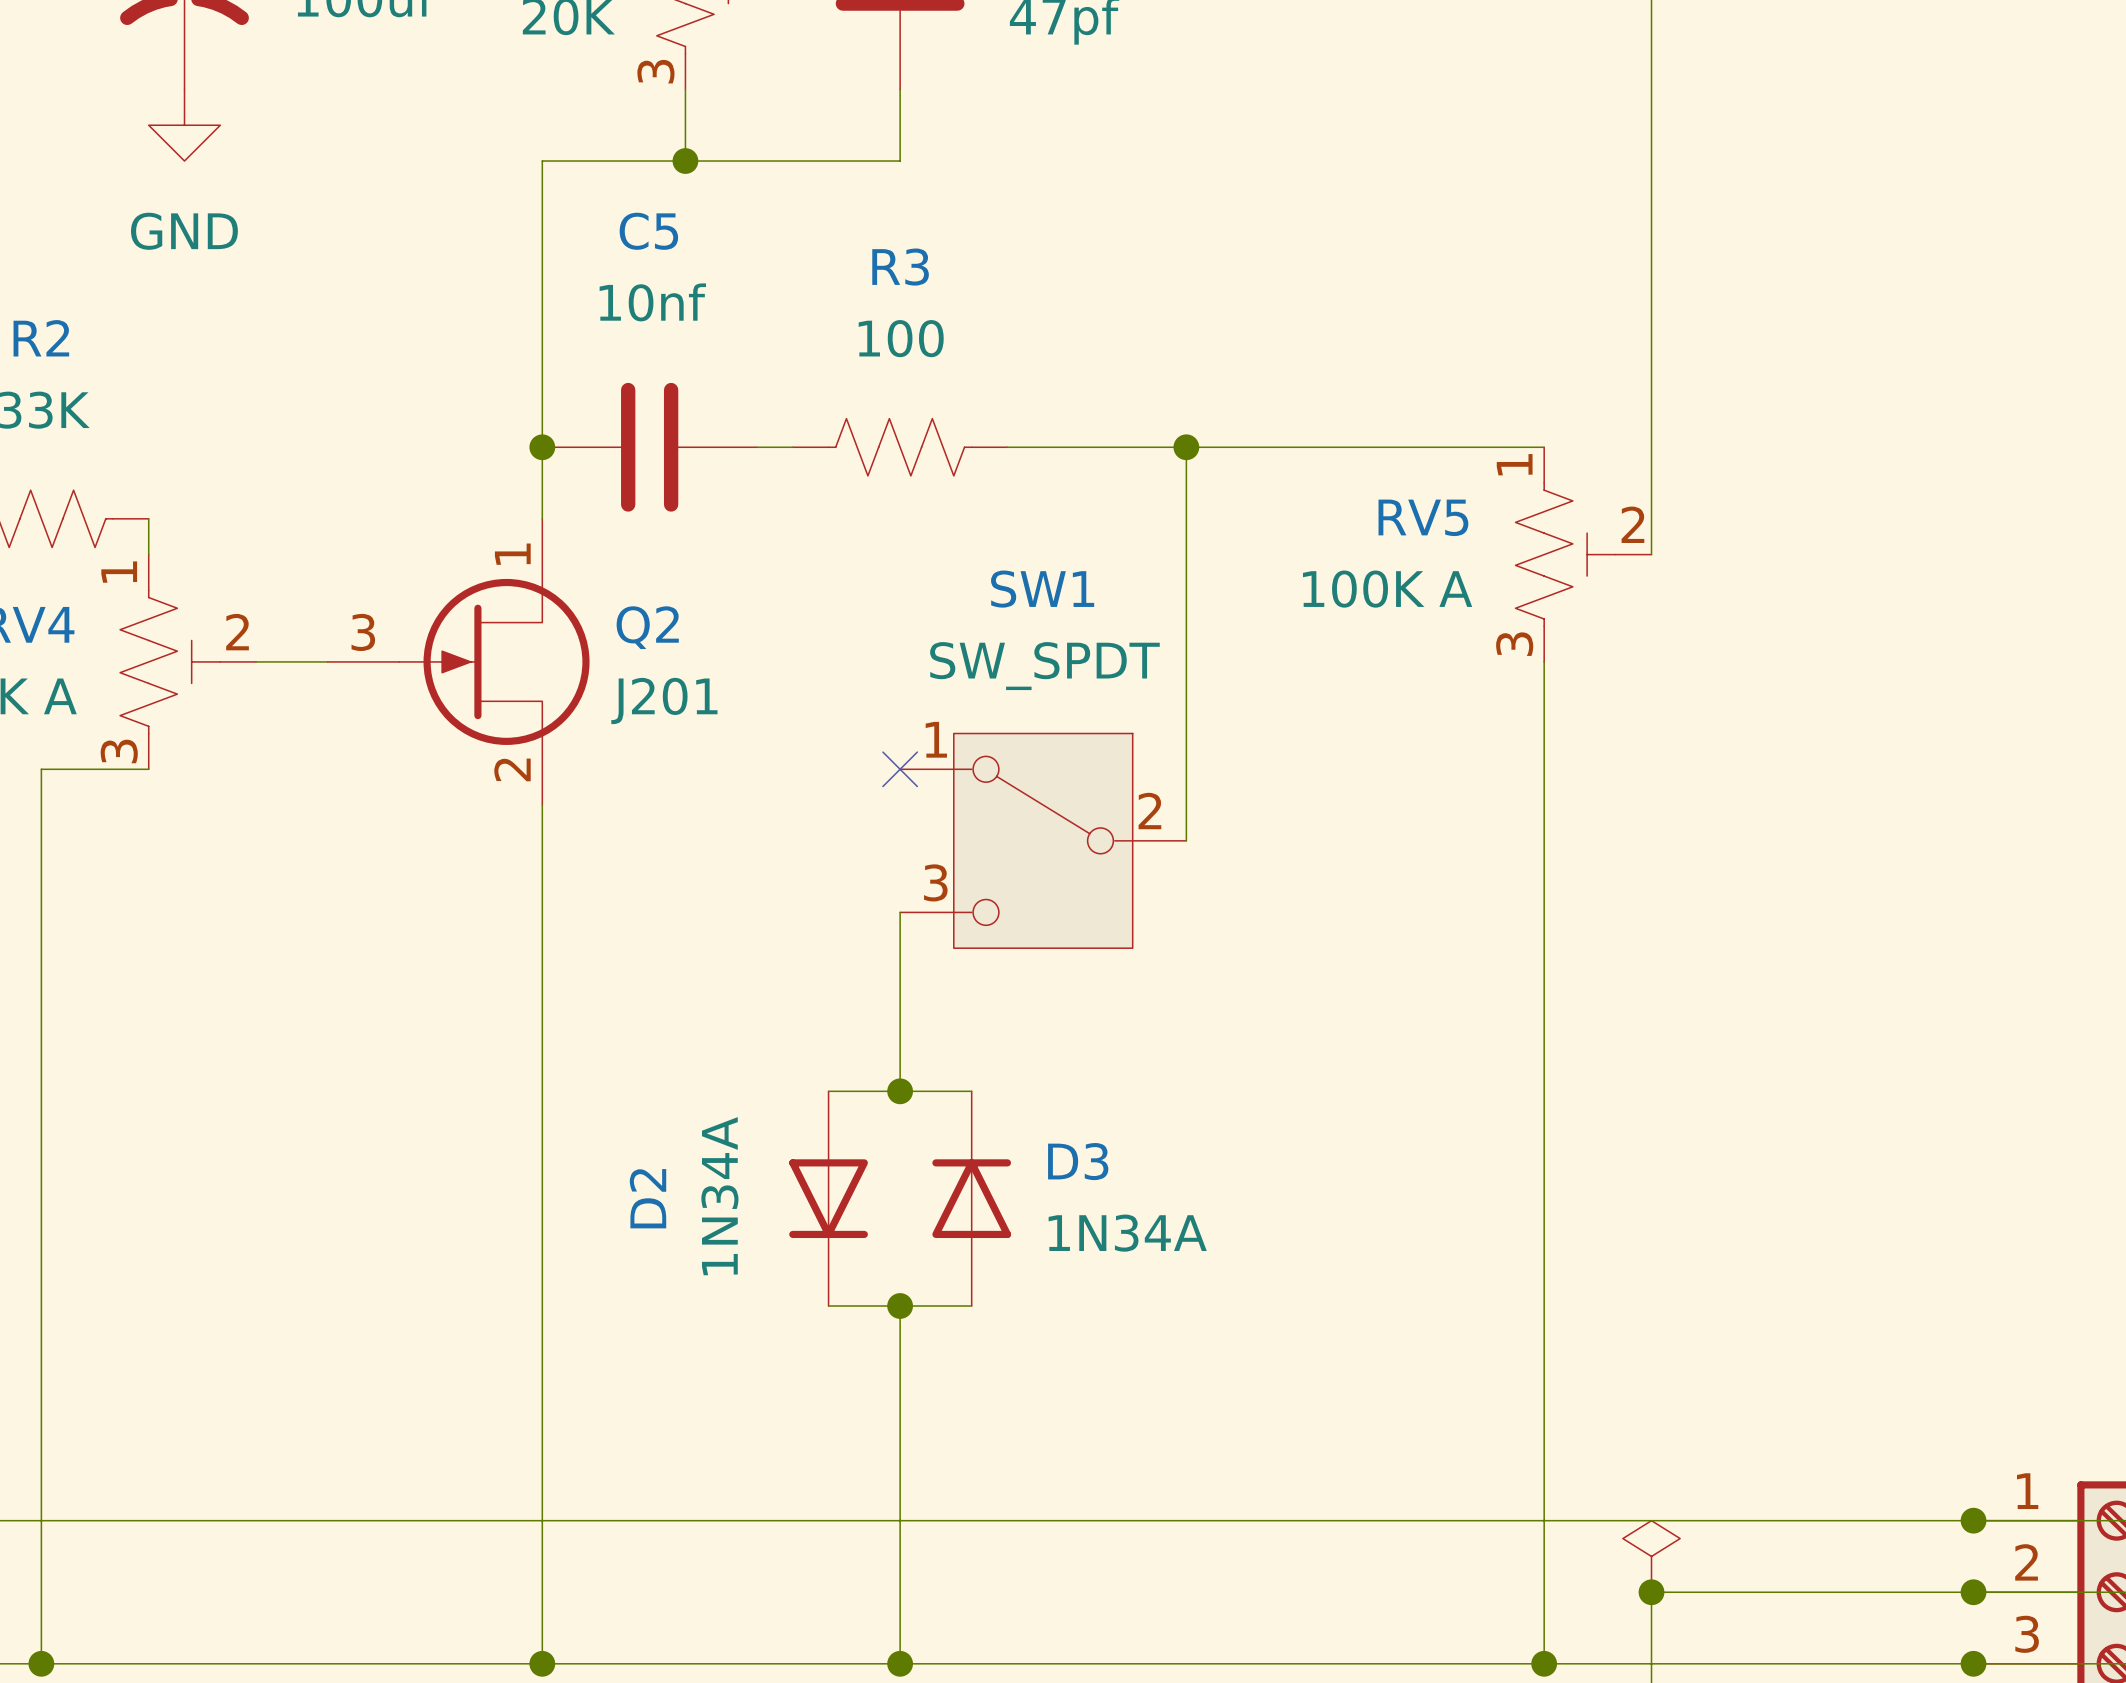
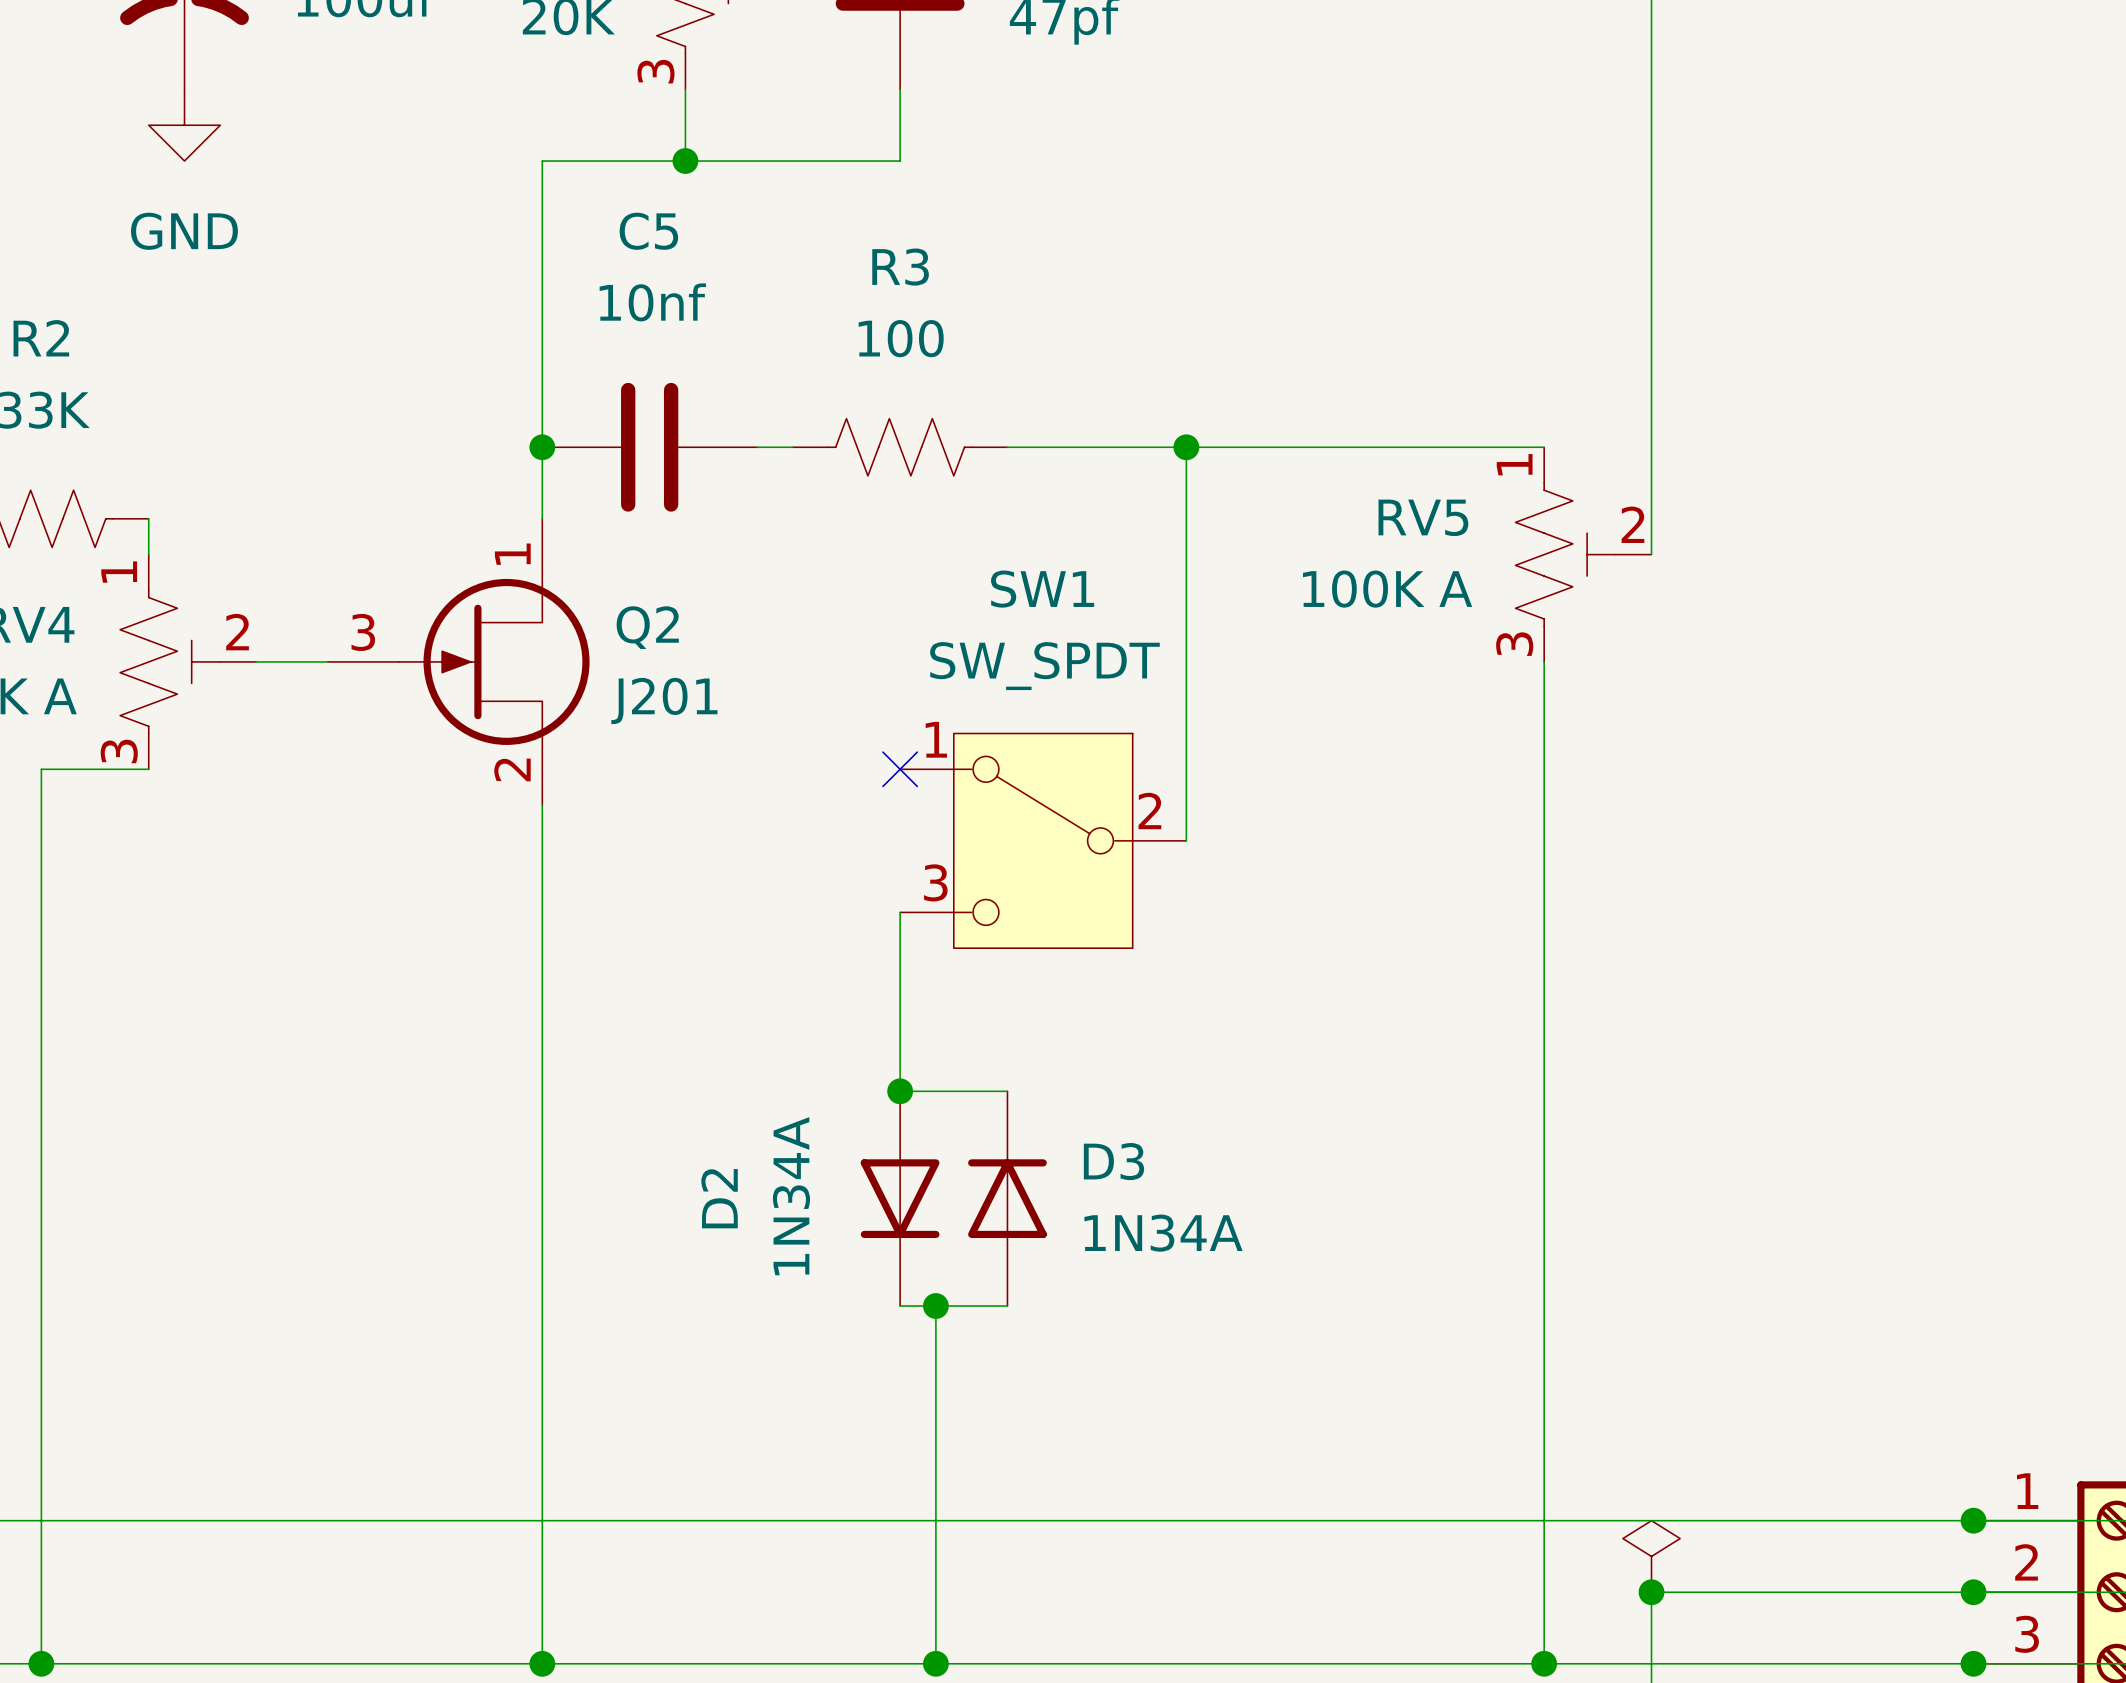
wire: (828, 1091) (900, 1091) -> none
wire: none -> (971, 1091) (1007, 1091)
D2 position: (828, 1198) -> (900, 1198)
D3 position: (971, 1198) -> (1007, 1198)
wire: (828, 1306) (900, 1306) (900, 1663) -> none
junction position: (900, 1306) -> (935, 1306)
wire: none -> (935, 1306) (935, 1663)
wire: none -> (971, 1306) (1007, 1306)
junction position: (900, 1663) -> (935, 1663)

